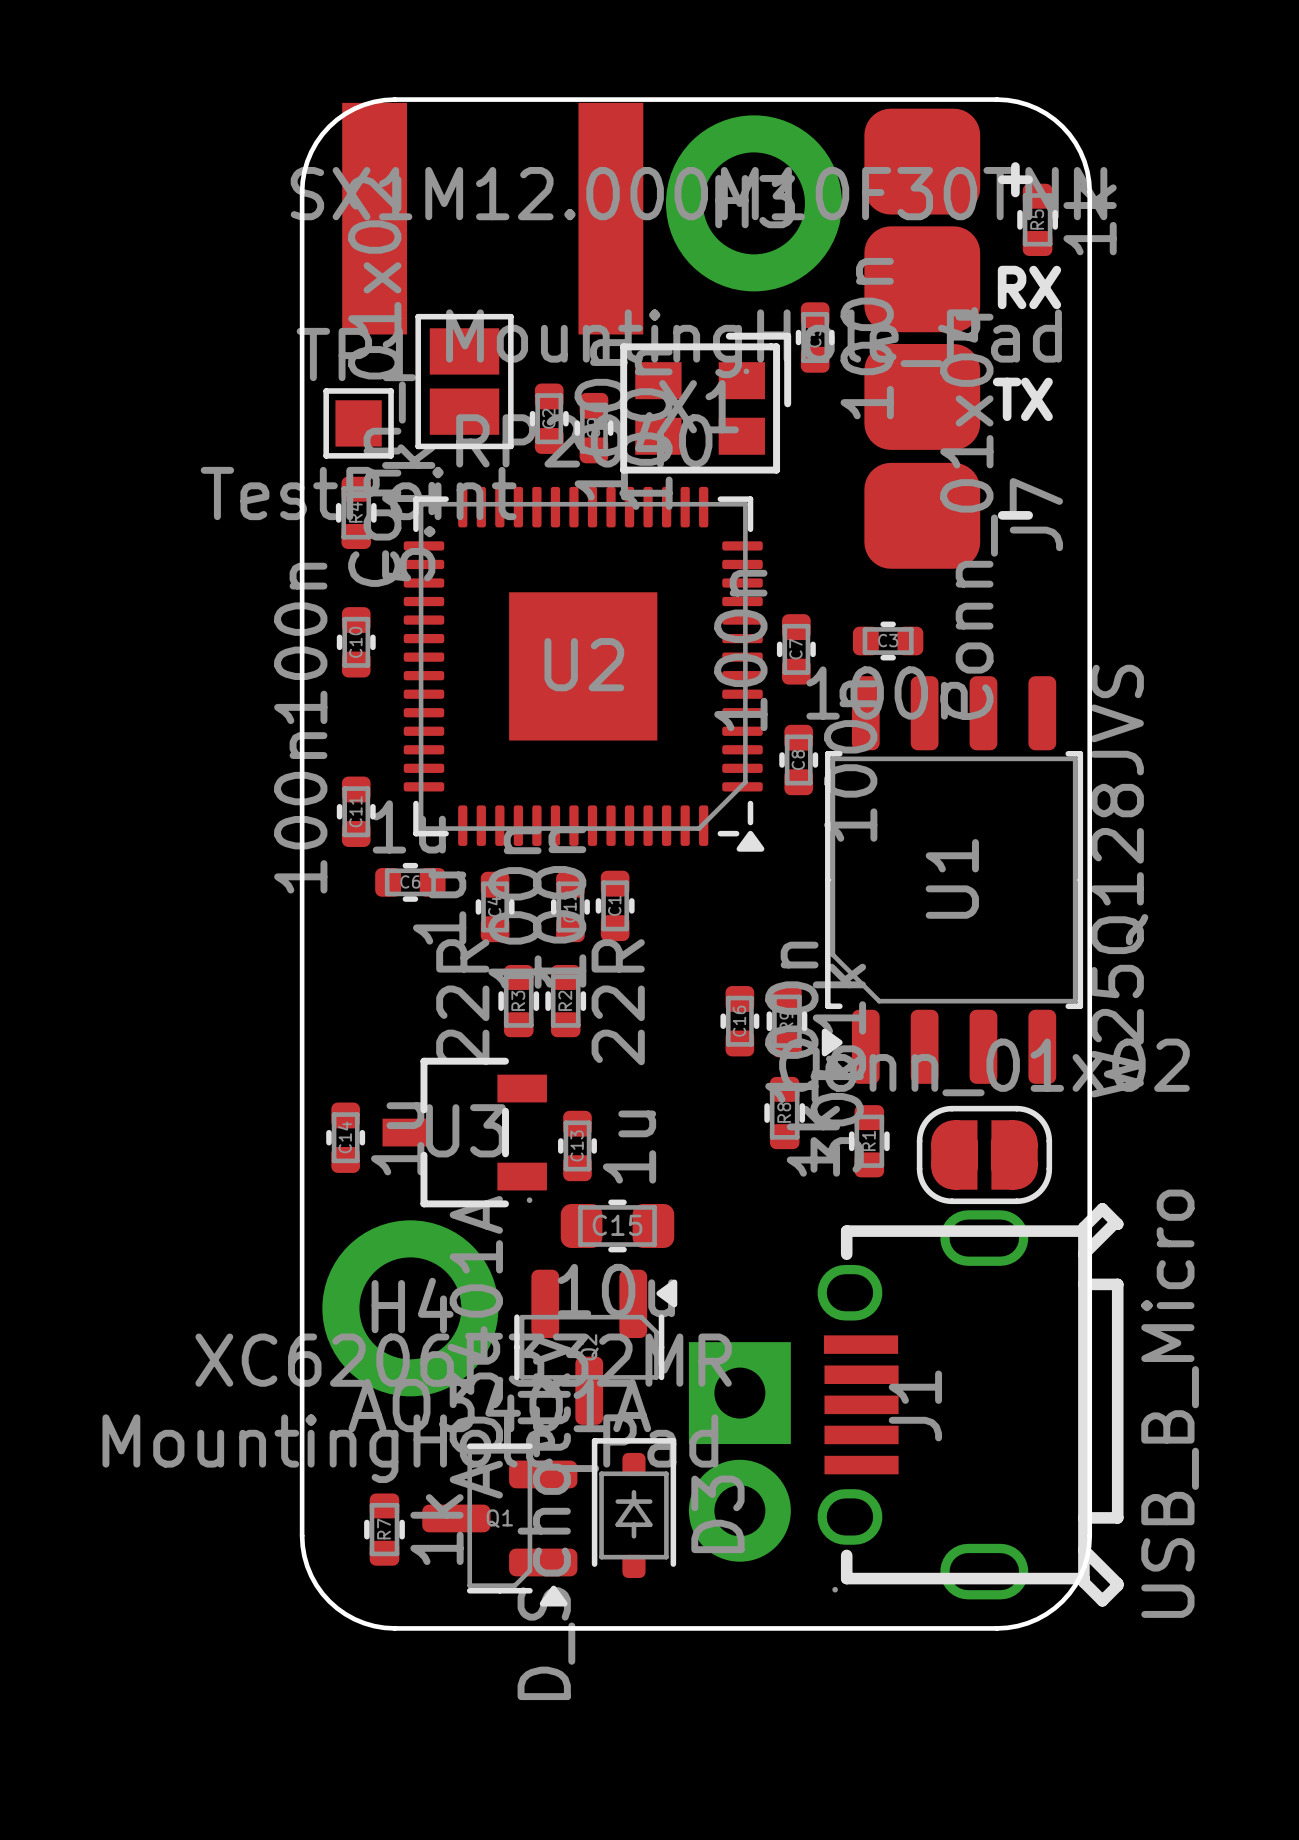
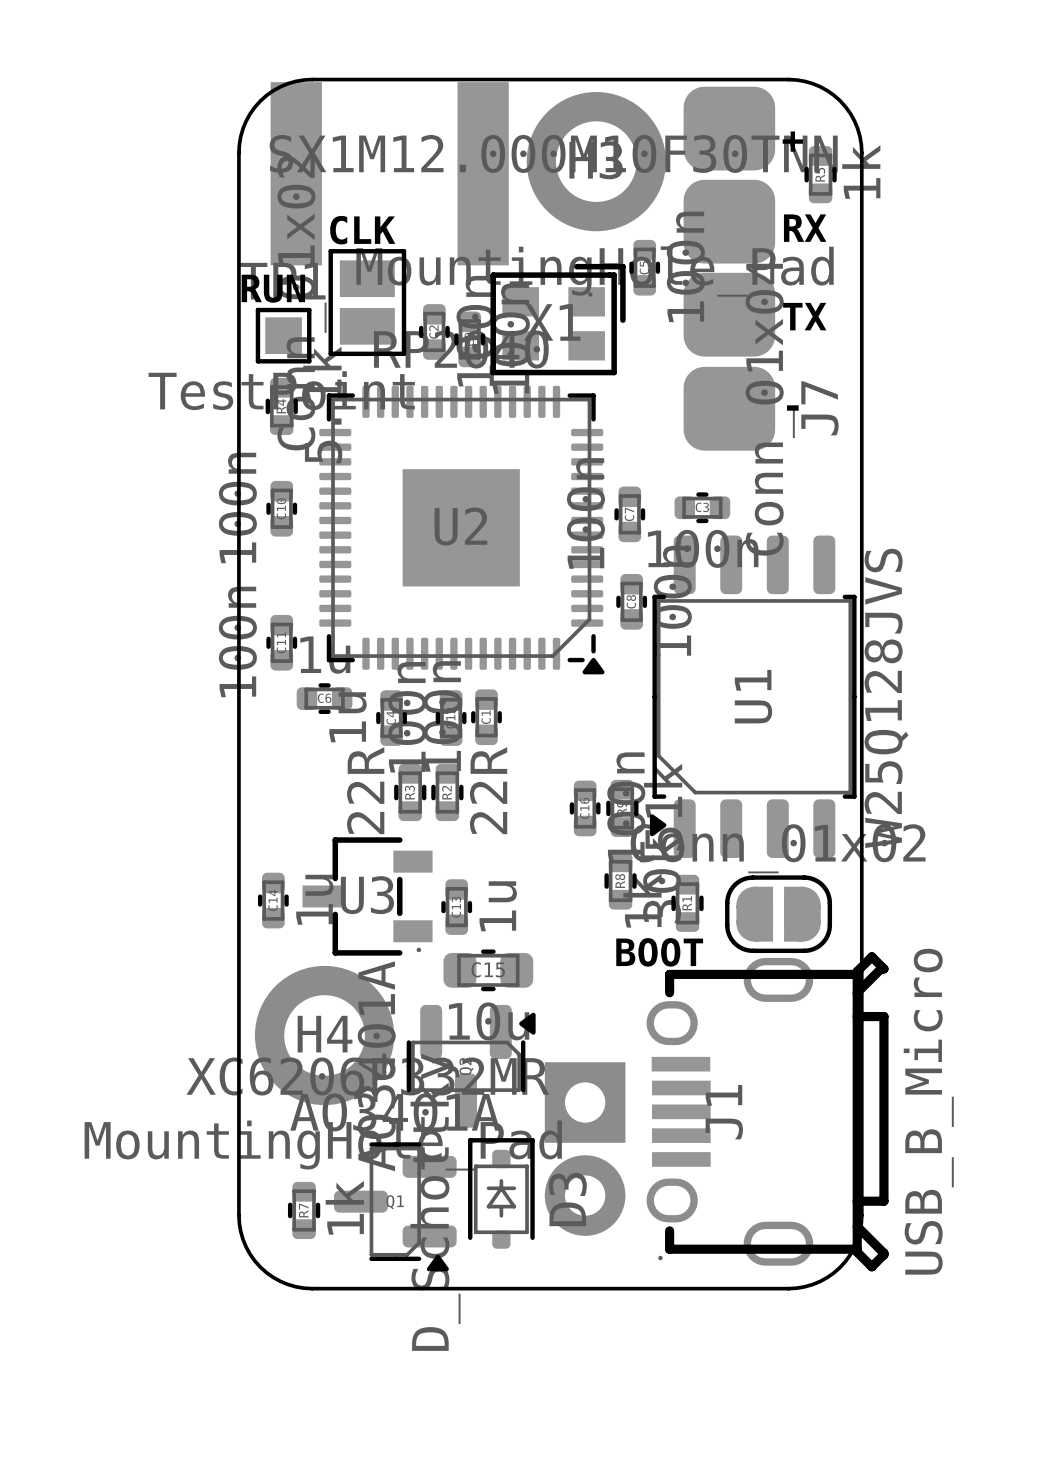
text: none -> CLK (362, 230)
text: none -> RUN (273, 288)
text: none -> BOOT (659, 952)

